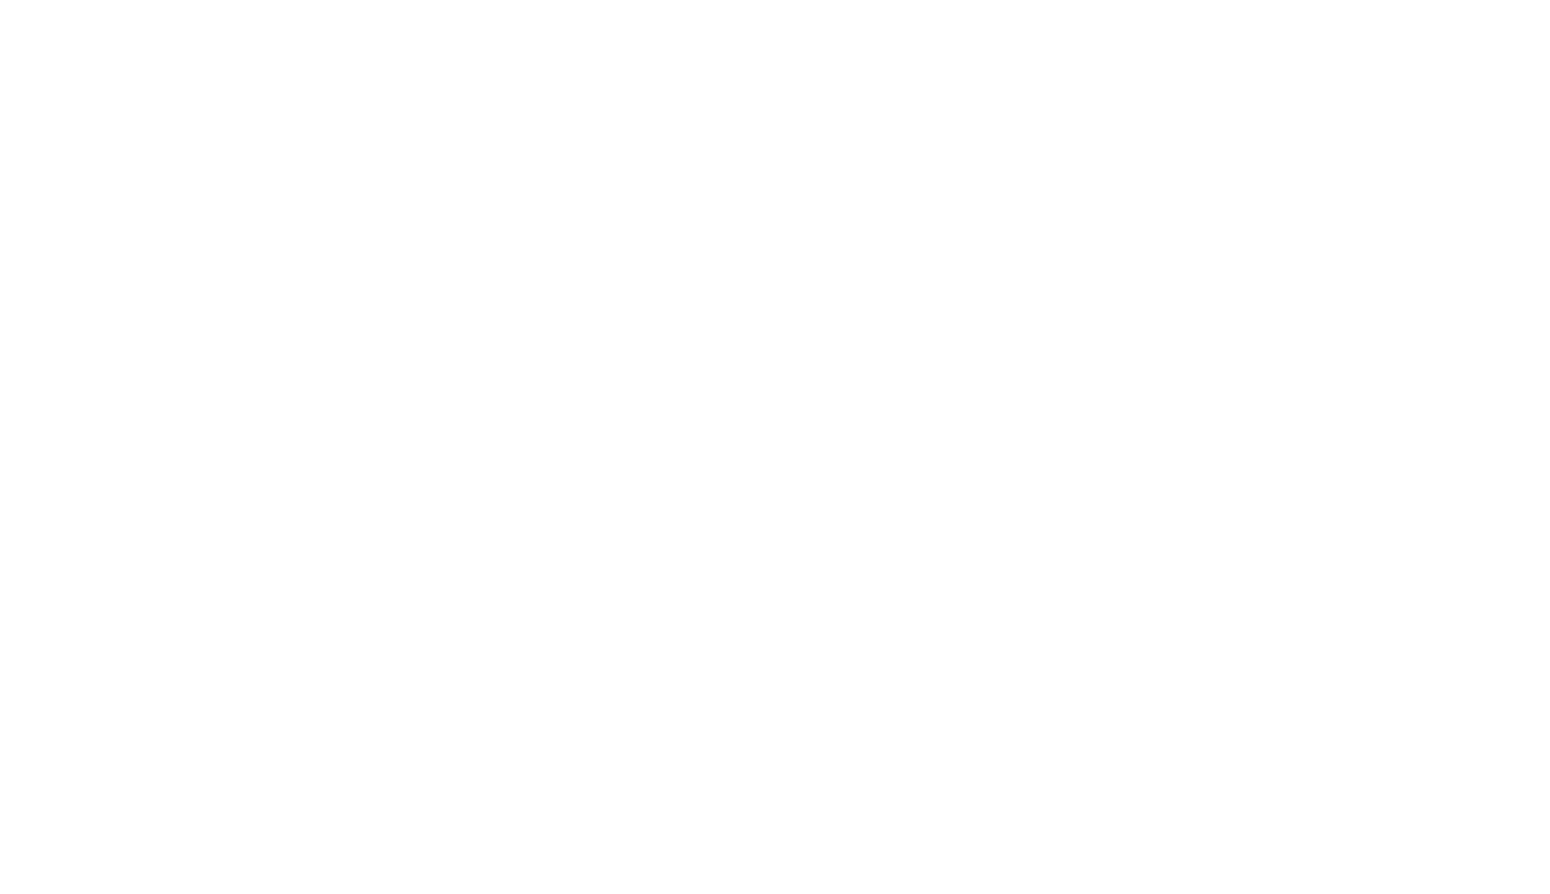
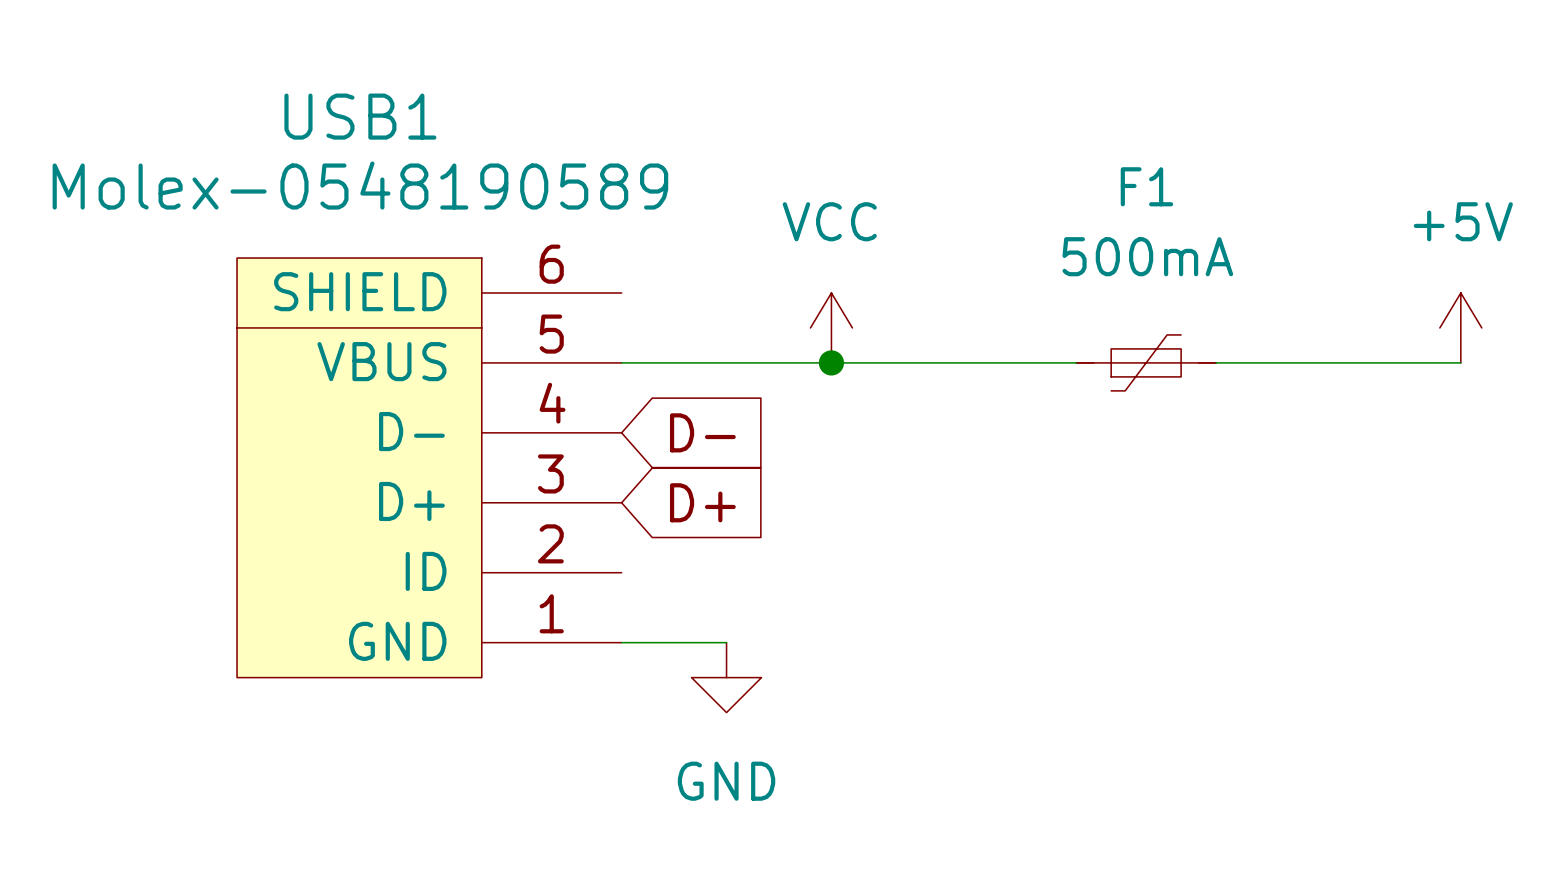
power symbol: none -> VCC (831, 327)
power symbol: none -> +5V (1460, 327)
wire: none -> (621, 362) (1076, 362)
junction: none -> (831, 362)
F1: none -> 500mA (1146, 362)
wire: none -> (1216, 362) (1460, 362)
global label: none -> D- (702, 432)
USB1: none -> Molex-0548190589 (429, 467)
global label: none -> D+ (702, 502)
wire: none -> (621, 642) (726, 642)
power symbol: none -> GND (726, 677)

